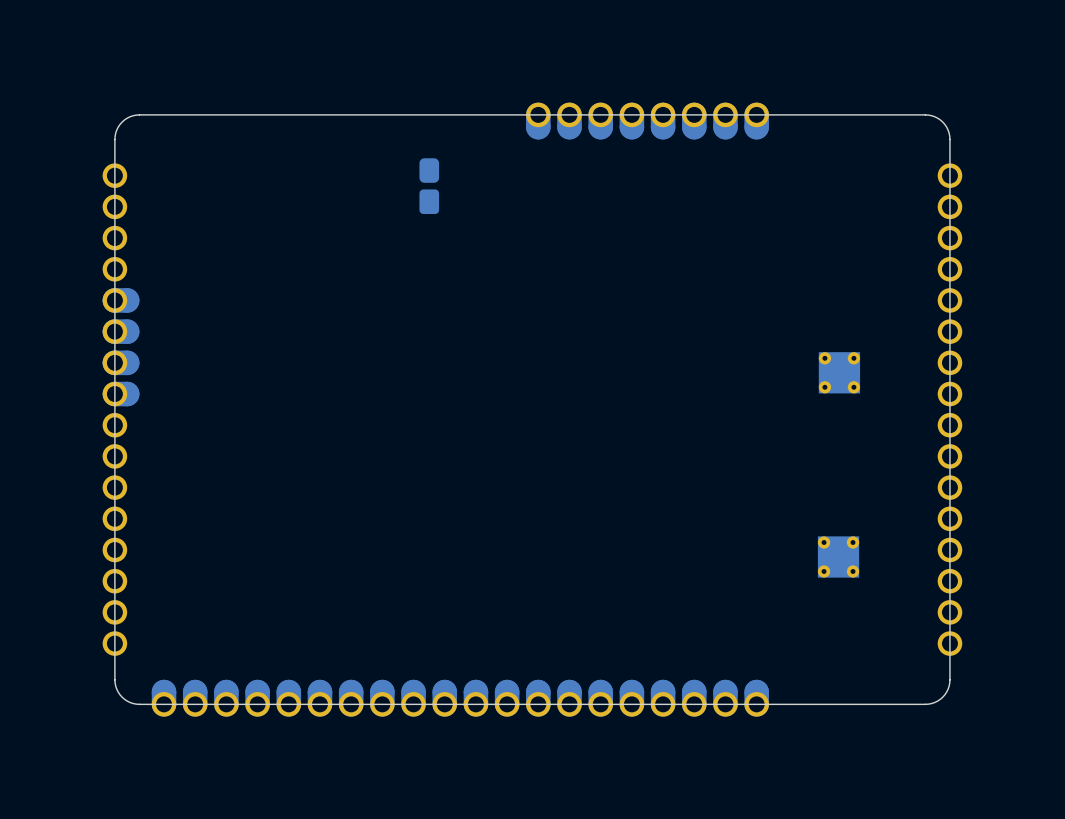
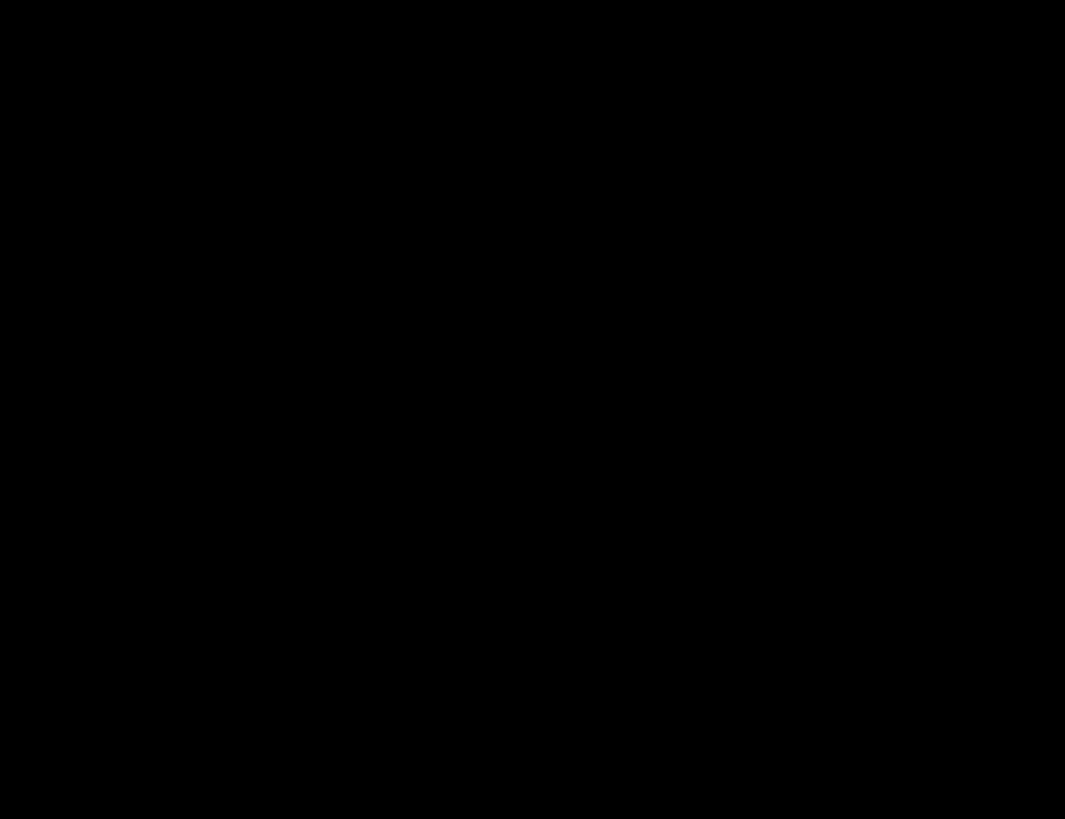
board edge: (925, 114) (139, 114) (124, 119) (116, 130) (114, 139) (114, 679) (119, 694) (130, 702) (139, 704) (925, 704) (940, 699) (948, 689) (949, 679) (949, 139) (948, 130) (942, 122) (934, 116) (925, 114) -> none
part: (647, 121) -> none
part: (429, 186) -> none
part: (839, 372) -> none
part: (121, 409) -> none
part: (949, 409) -> none
part: (838, 556) -> none
part: (460, 698) -> none

